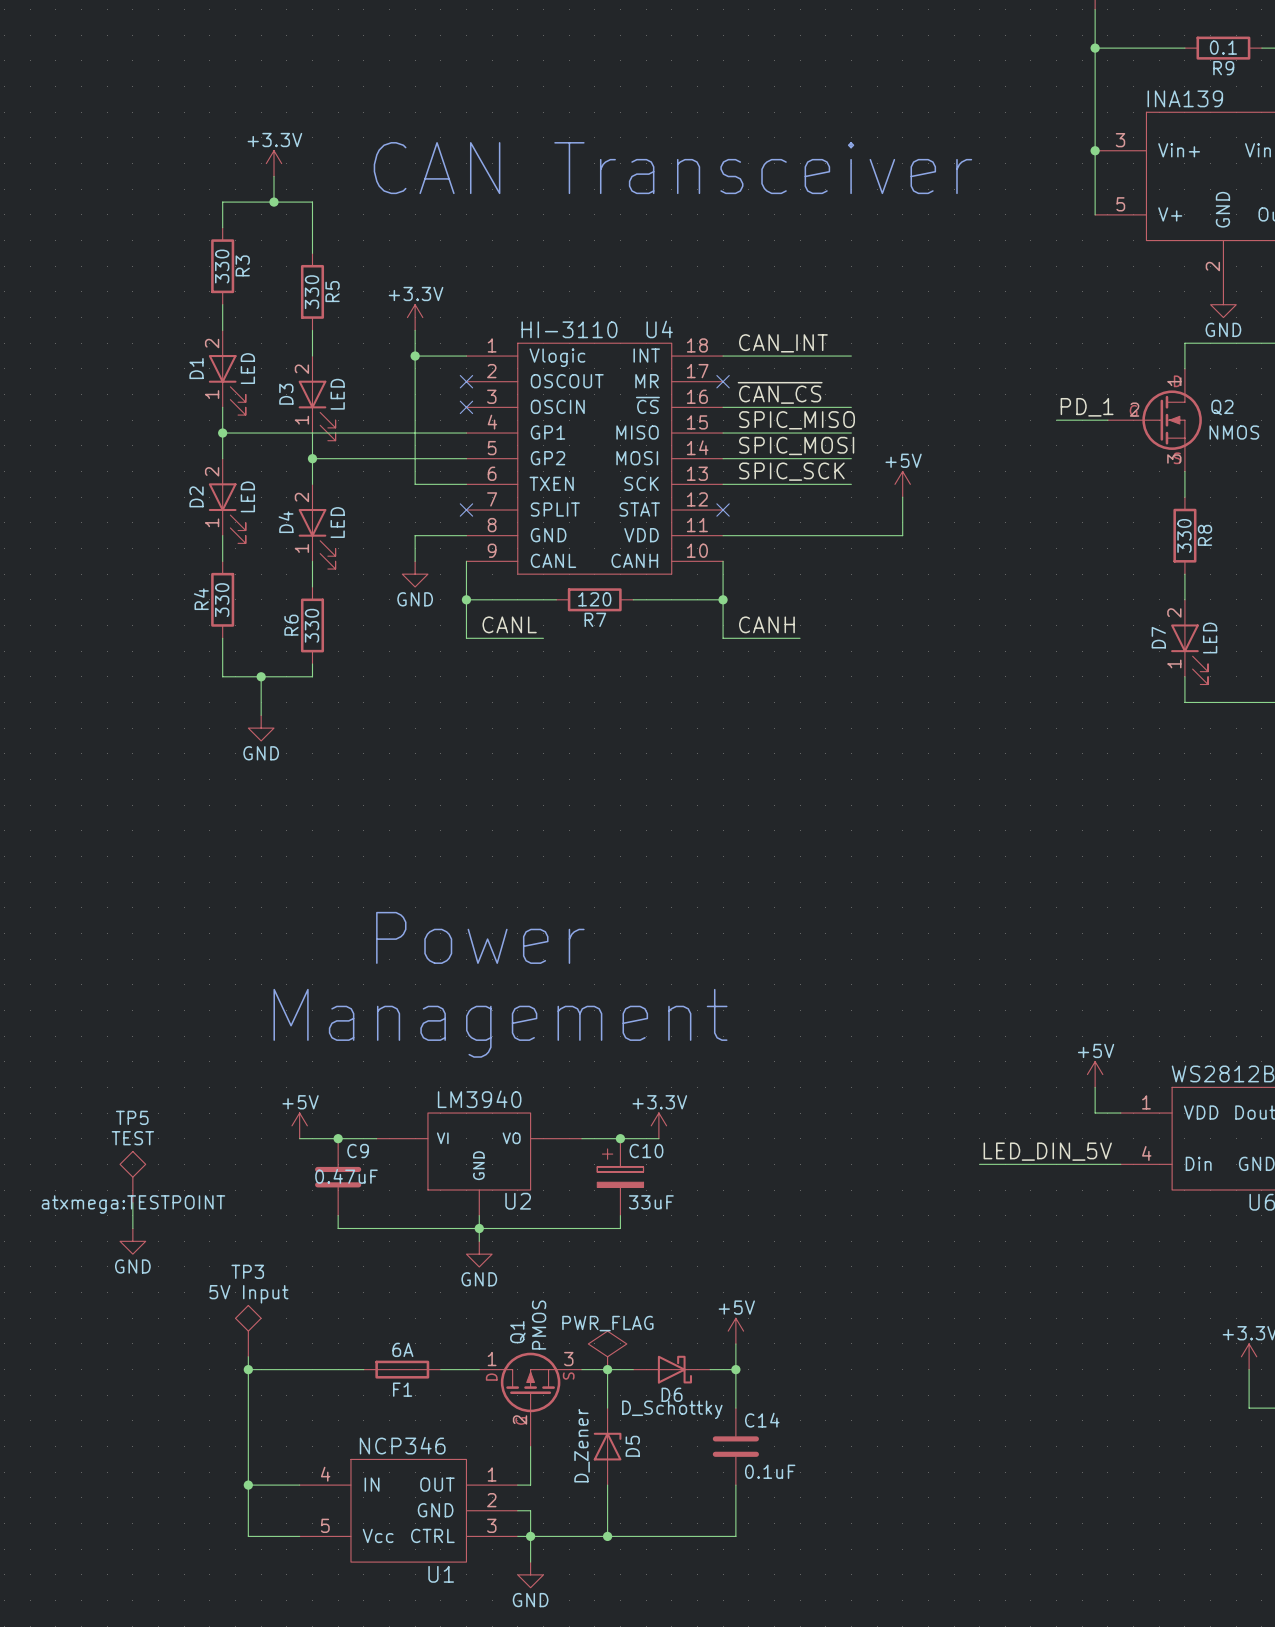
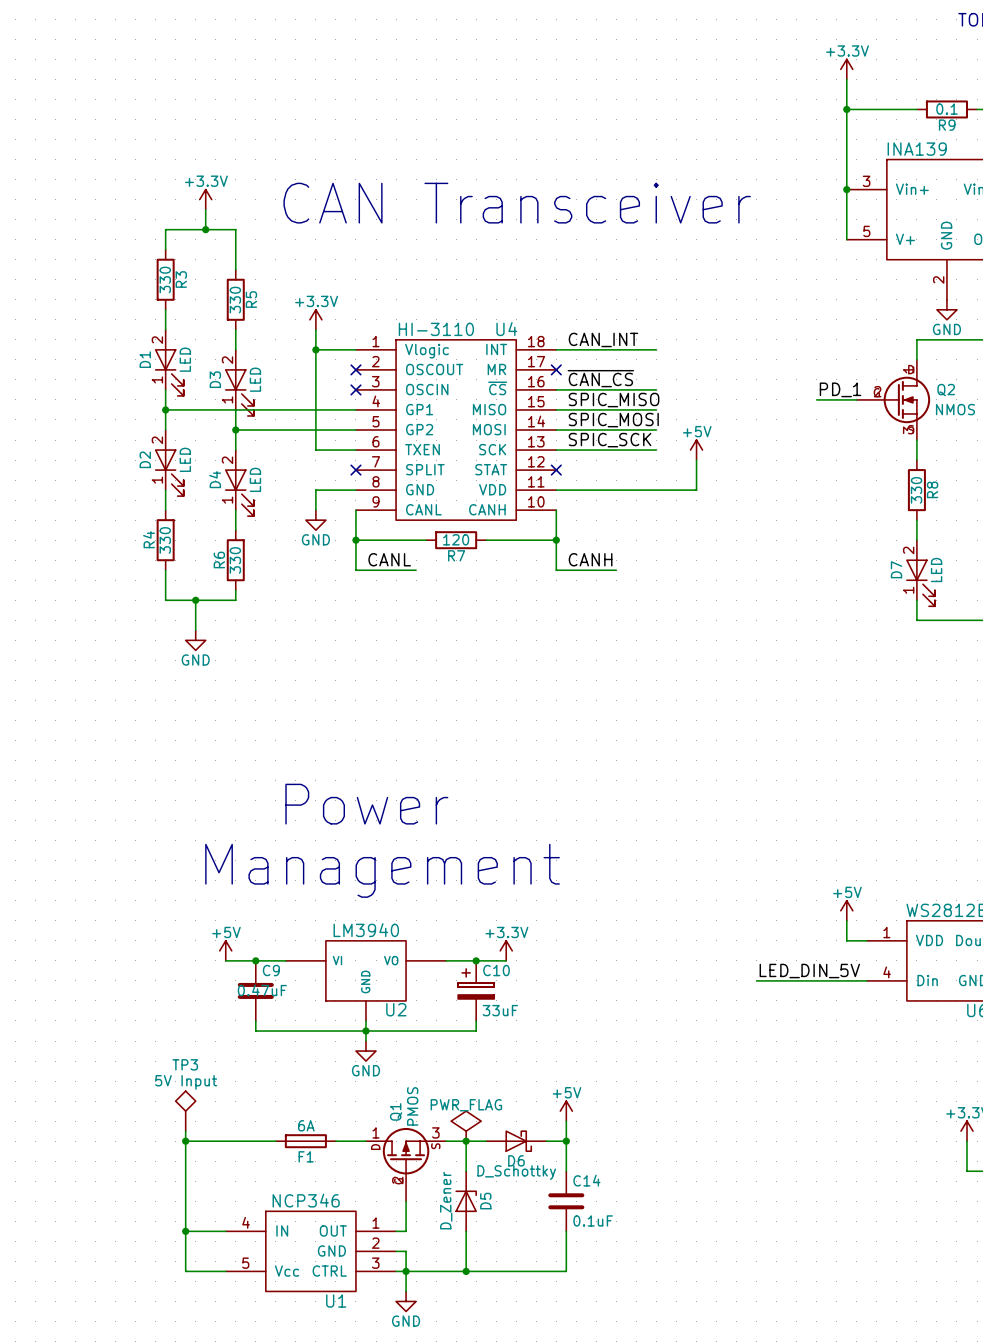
TP5: TEST (132, 1177) -> none
wire: (132, 1202) (132, 1228) -> none
power symbol: GND (132, 1241) -> none

